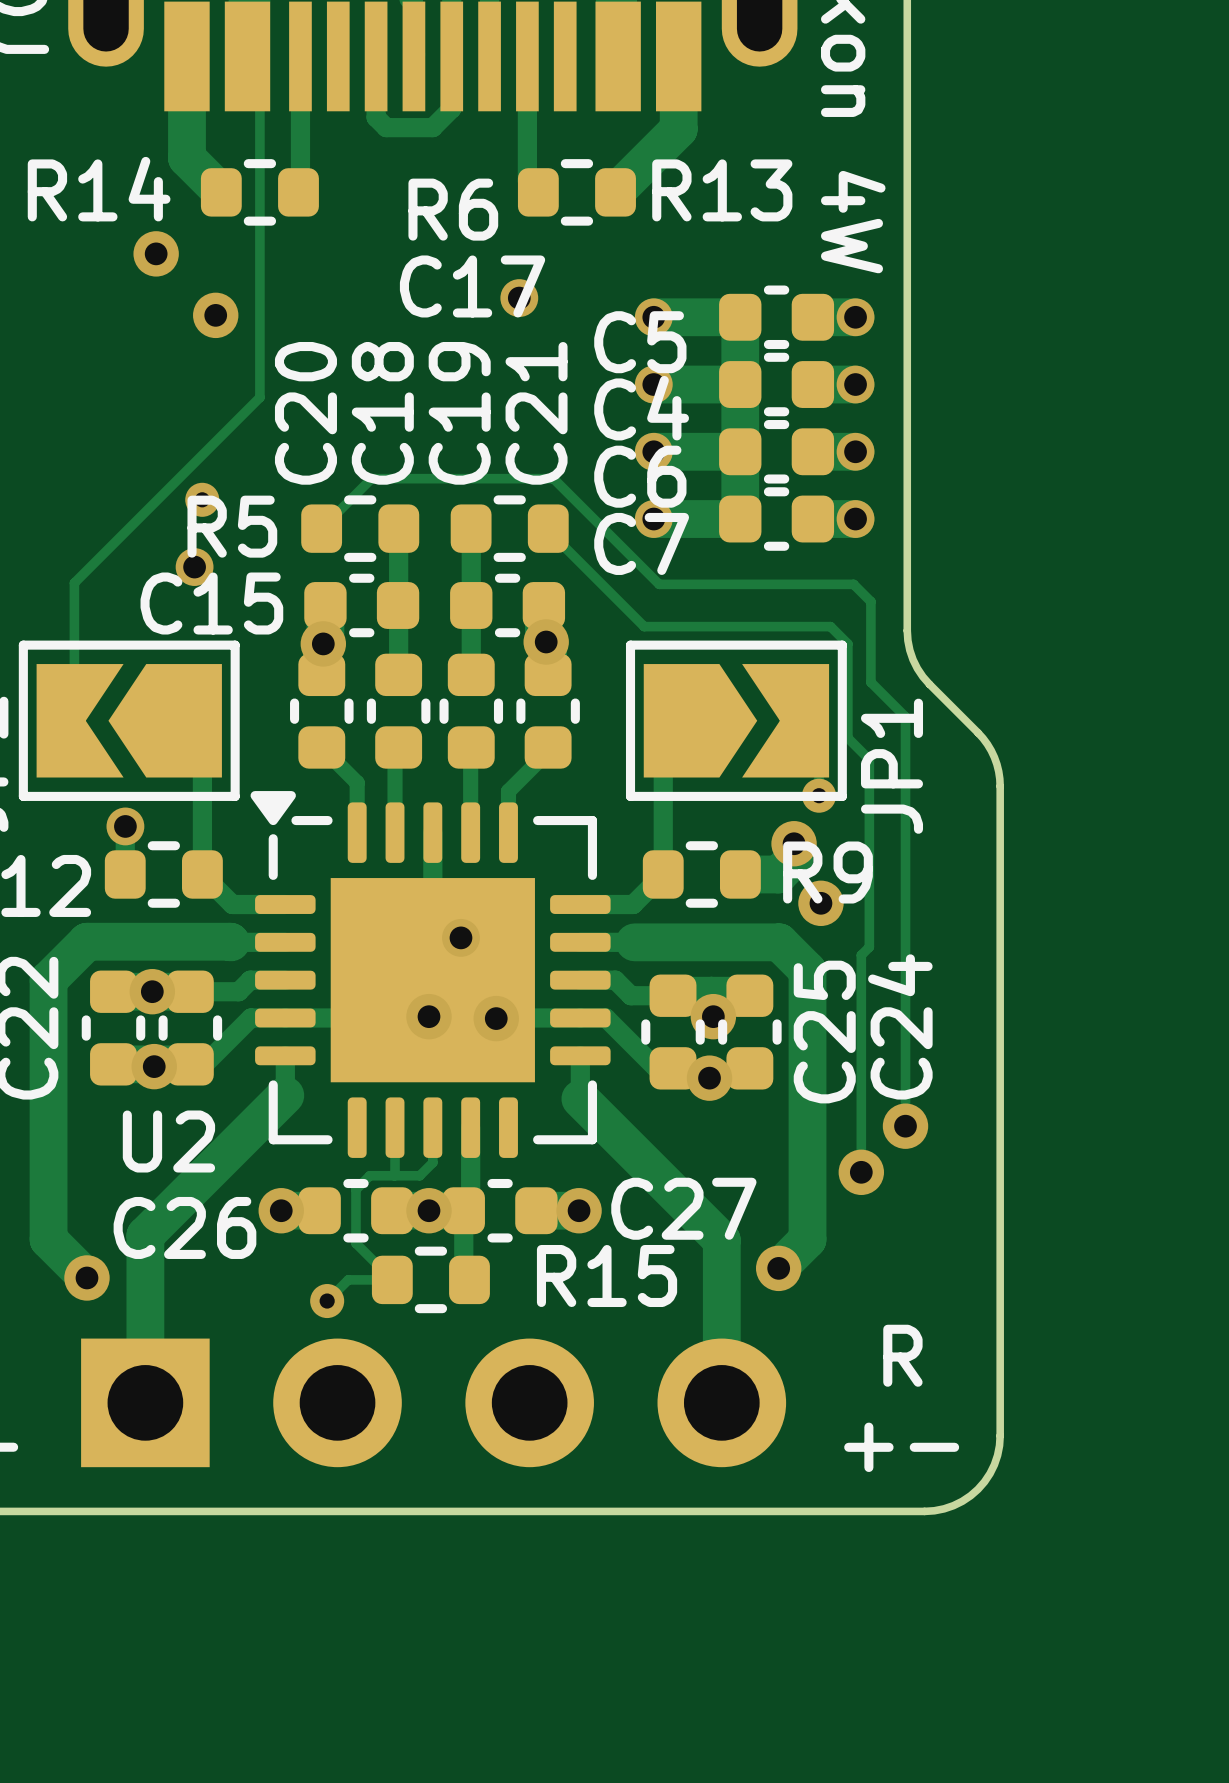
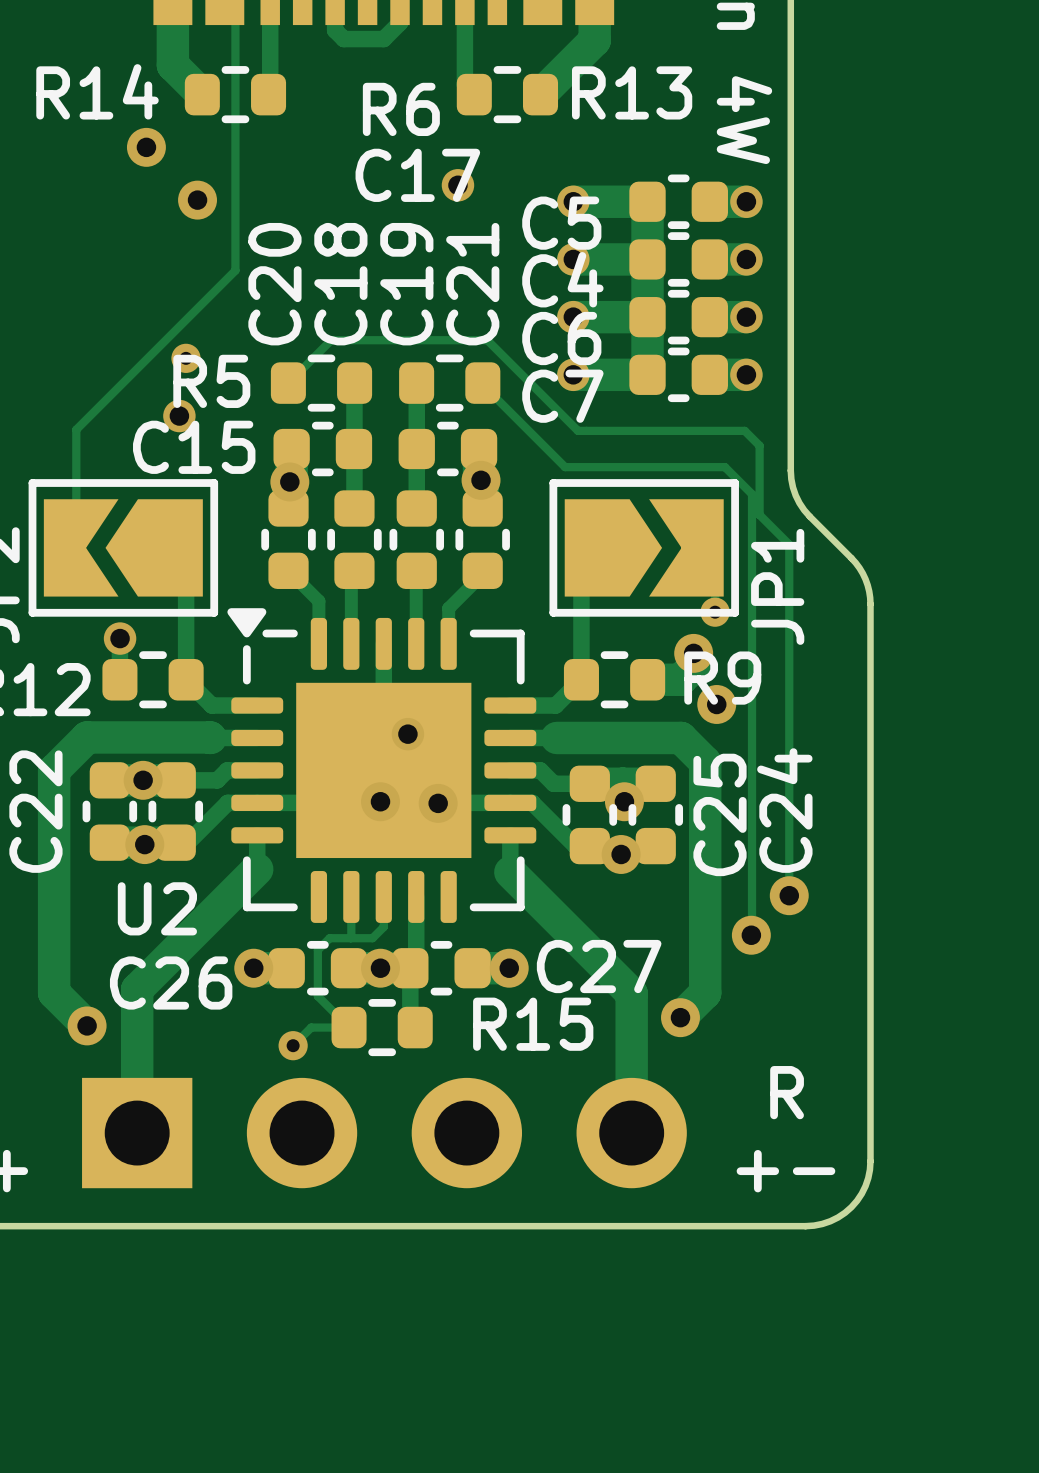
track: (847, 643) (847, 738) (869, 759) (869, 947) (861, 955) (861, 1172) -> (739, 481) (752, 494) (752, 934)

